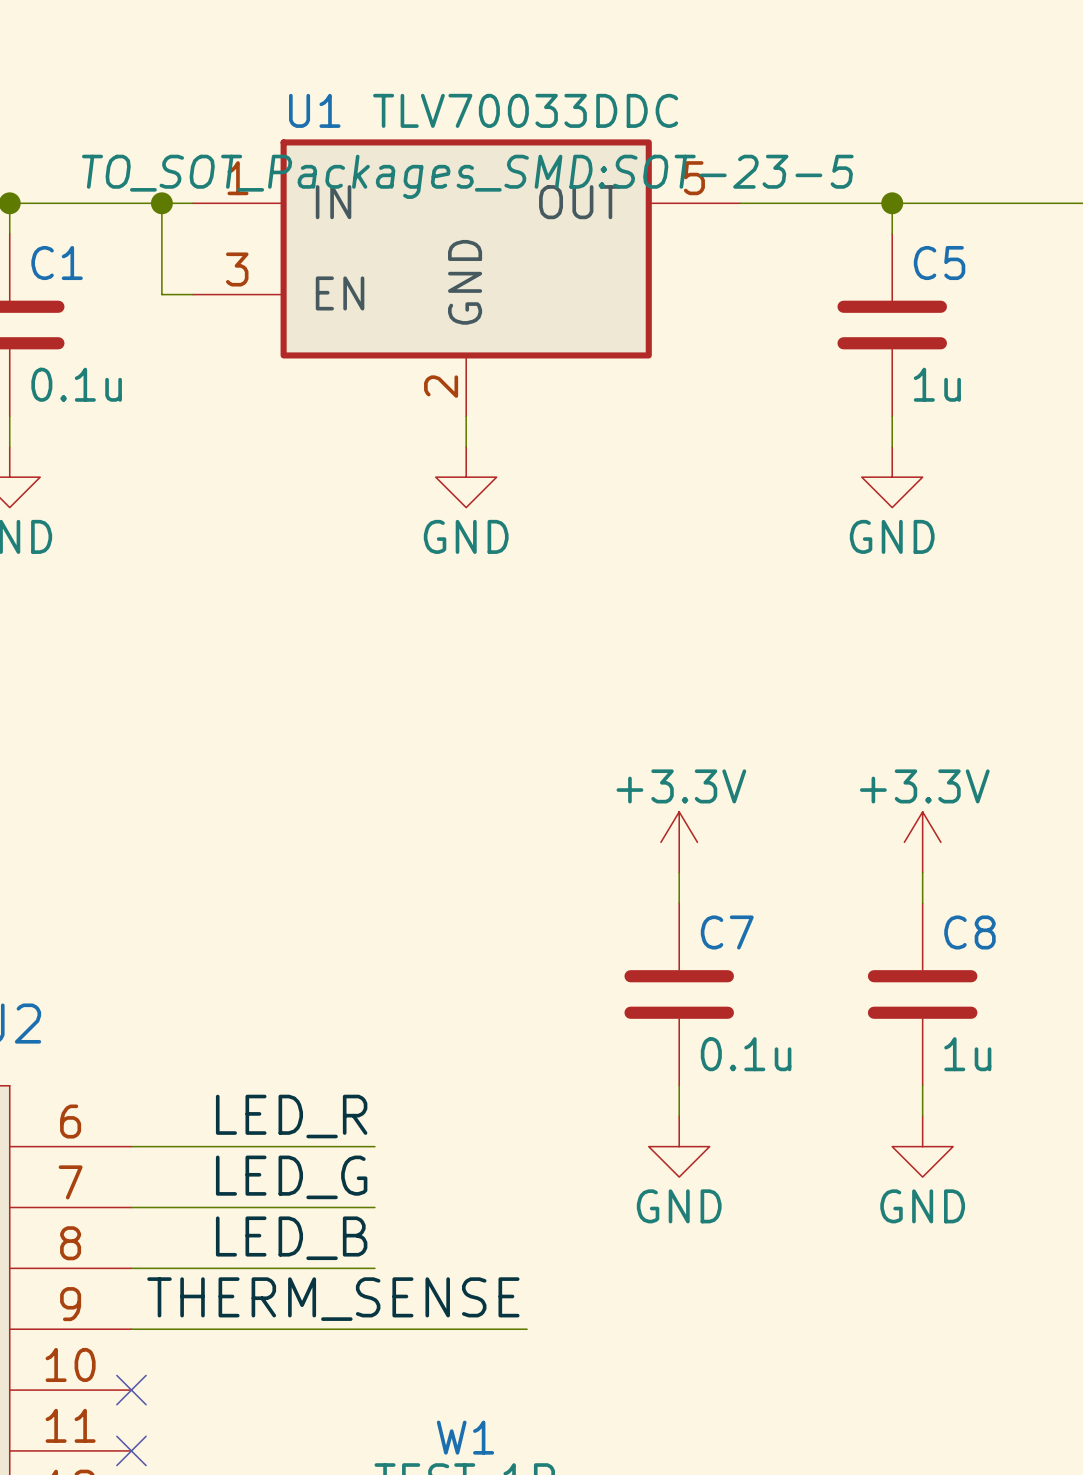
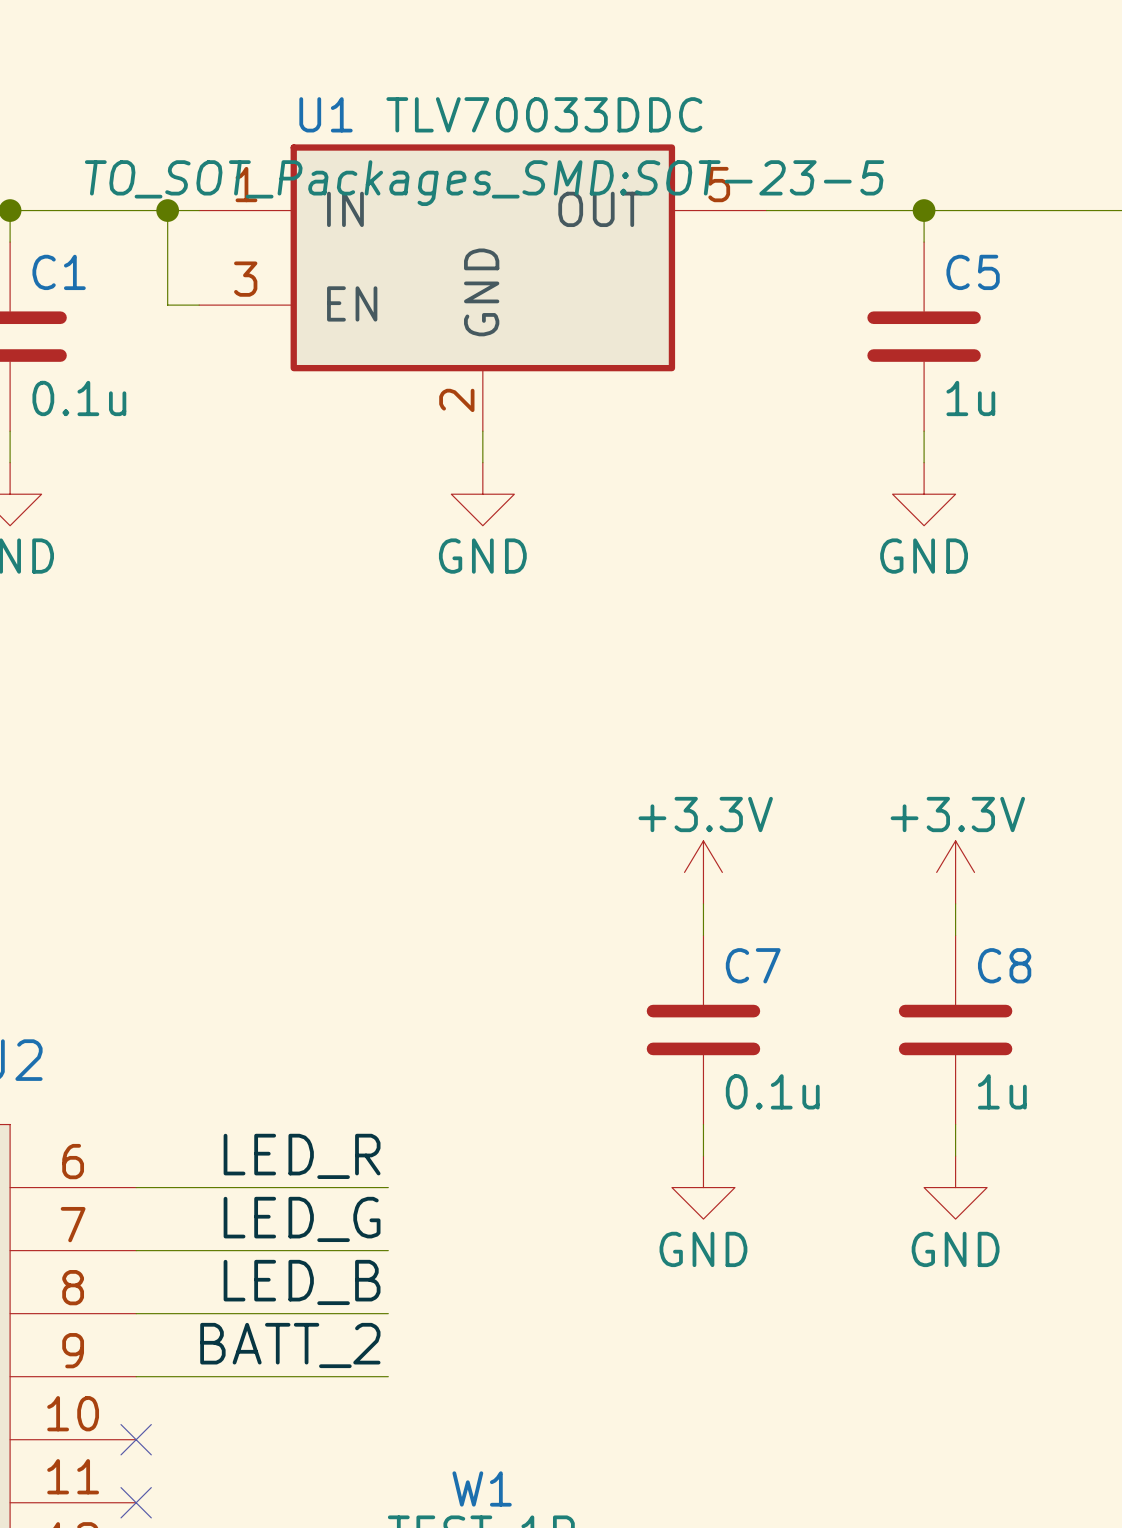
label: none -> BATT_2 (290, 1345)
label: THERM_SENSE (333, 1299) -> none
wire: (374, 1329) (527, 1329) -> none

